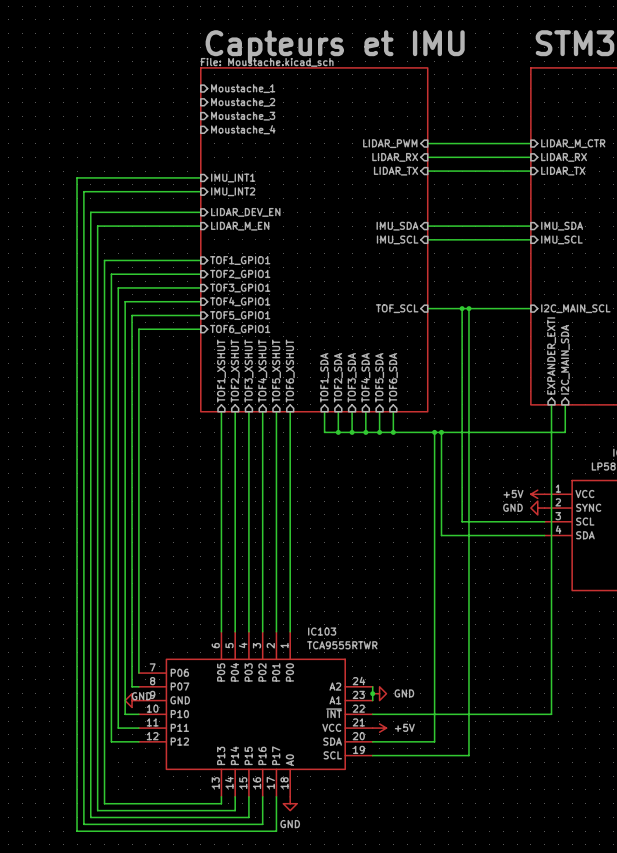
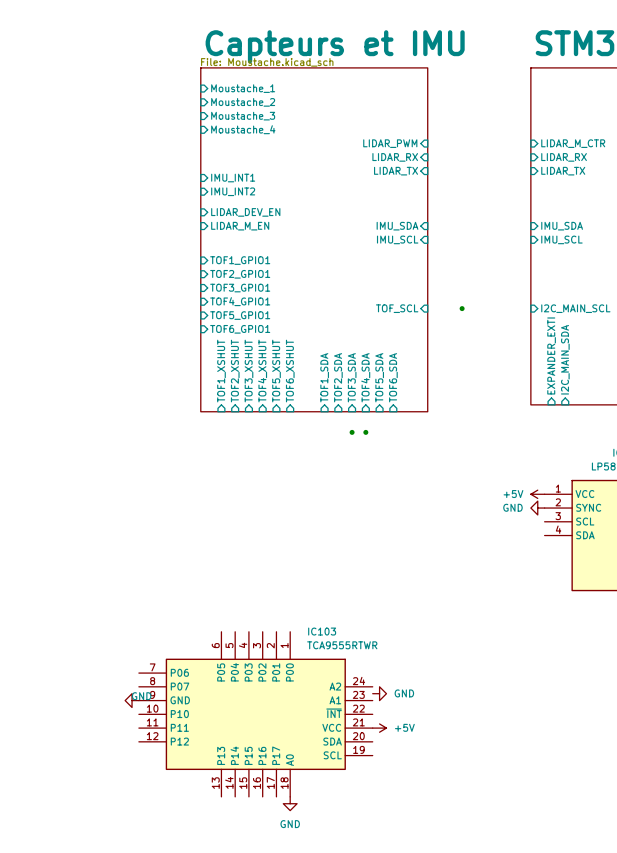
wire: (427, 143) (530, 143) -> none
wire: (427, 157) (530, 157) -> none
wire: (427, 171) (530, 171) -> none
wire: (200, 177) (77, 177) (77, 831) (276, 831) (276, 796) -> none
wire: (200, 191) (83, 191) (83, 824) (262, 824) (262, 796) -> none
wire: (200, 212) (90, 212) (90, 817) (248, 817) (248, 796) -> none
wire: (200, 226) (97, 226) (97, 810) (235, 810) (235, 796) -> none
wire: (427, 226) (530, 226) -> none
wire: (427, 239) (530, 239) -> none
wire: (200, 260) (104, 260) (104, 803) (221, 803) (221, 796) -> none
wire: (200, 274) (111, 274) (111, 741) (138, 741) -> none
wire: (200, 287) (118, 287) (118, 728) (138, 728) -> none
wire: (200, 301) (125, 301) (125, 714) (138, 714) -> none
wire: (427, 308) (530, 308) -> none
wire: (462, 308) (462, 521) (544, 521) -> none
wire: (468, 308) (468, 755) (372, 755) -> none
junction: (468, 308) -> none
wire: (200, 315) (132, 315) (132, 686) (138, 686) -> none
wire: (200, 329) (138, 329) (138, 673) -> none
wire: (551, 404) (551, 714) (372, 714) -> none
wire: (565, 404) (565, 432) (324, 432) (324, 411) -> none
wire: (221, 411) (221, 631) -> none
wire: (235, 411) (235, 631) -> none
wire: (248, 411) (248, 631) -> none
wire: (262, 411) (262, 631) -> none
wire: (276, 411) (276, 631) -> none
wire: (290, 411) (290, 631) -> none
wire: (338, 411) (338, 432) -> none
wire: (352, 411) (352, 432) -> none
wire: (365, 411) (365, 432) -> none
wire: (379, 411) (379, 432) -> none
wire: (393, 411) (393, 432) -> none
junction: (338, 432) -> none
junction: (379, 432) -> none
junction: (393, 432) -> none
wire: (434, 432) (434, 741) (372, 741) -> none
junction: (434, 432) -> none
wire: (441, 432) (441, 535) (544, 535) -> none
junction: (441, 432) -> none
wire: (372, 686) (372, 700) -> none
junction: (372, 693) -> none

